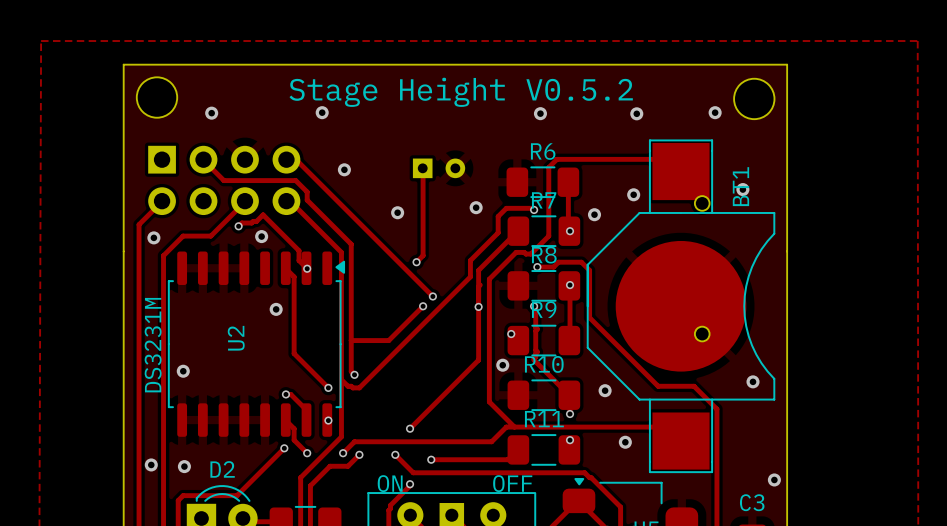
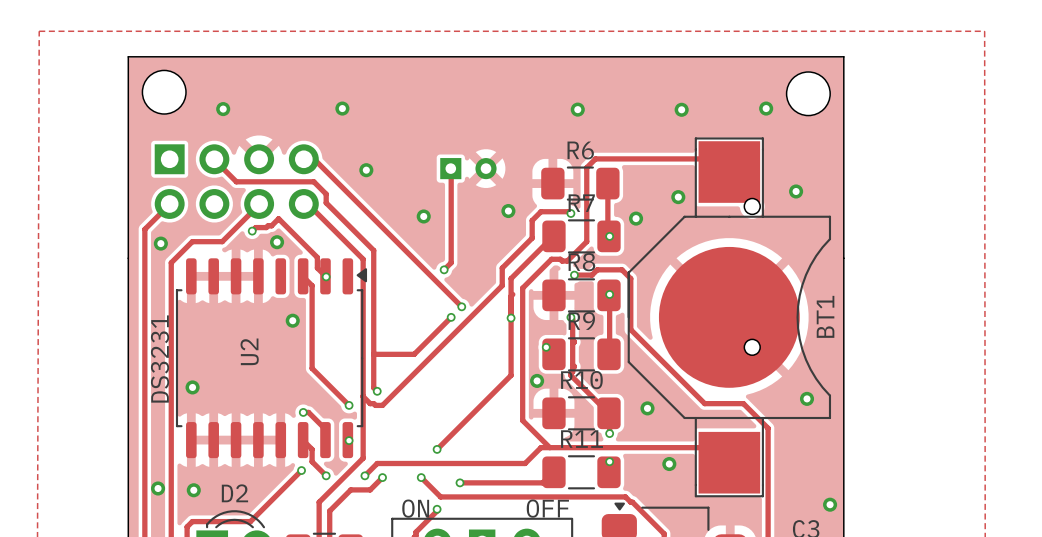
text: Stage Height V0.5.2 (461, 92) -> none
BT1 name position: BT1 (740, 186) -> BT1 (825, 316)
text: DS3231M (153, 345) -> DS3231 (160, 359)

